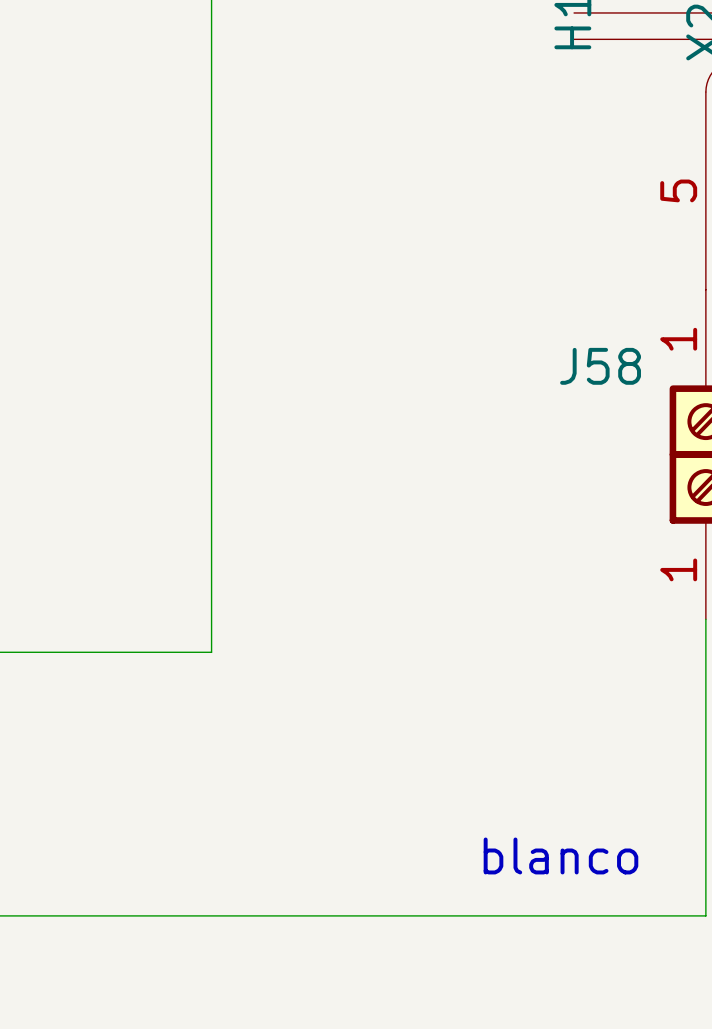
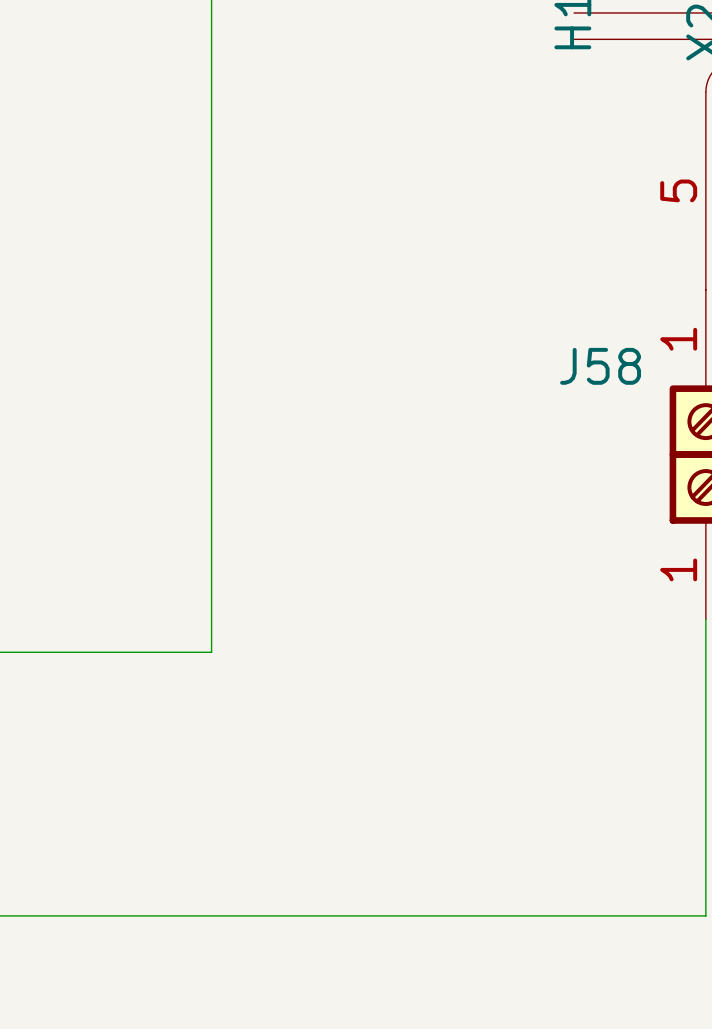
text: blanco (560, 855) -> none

